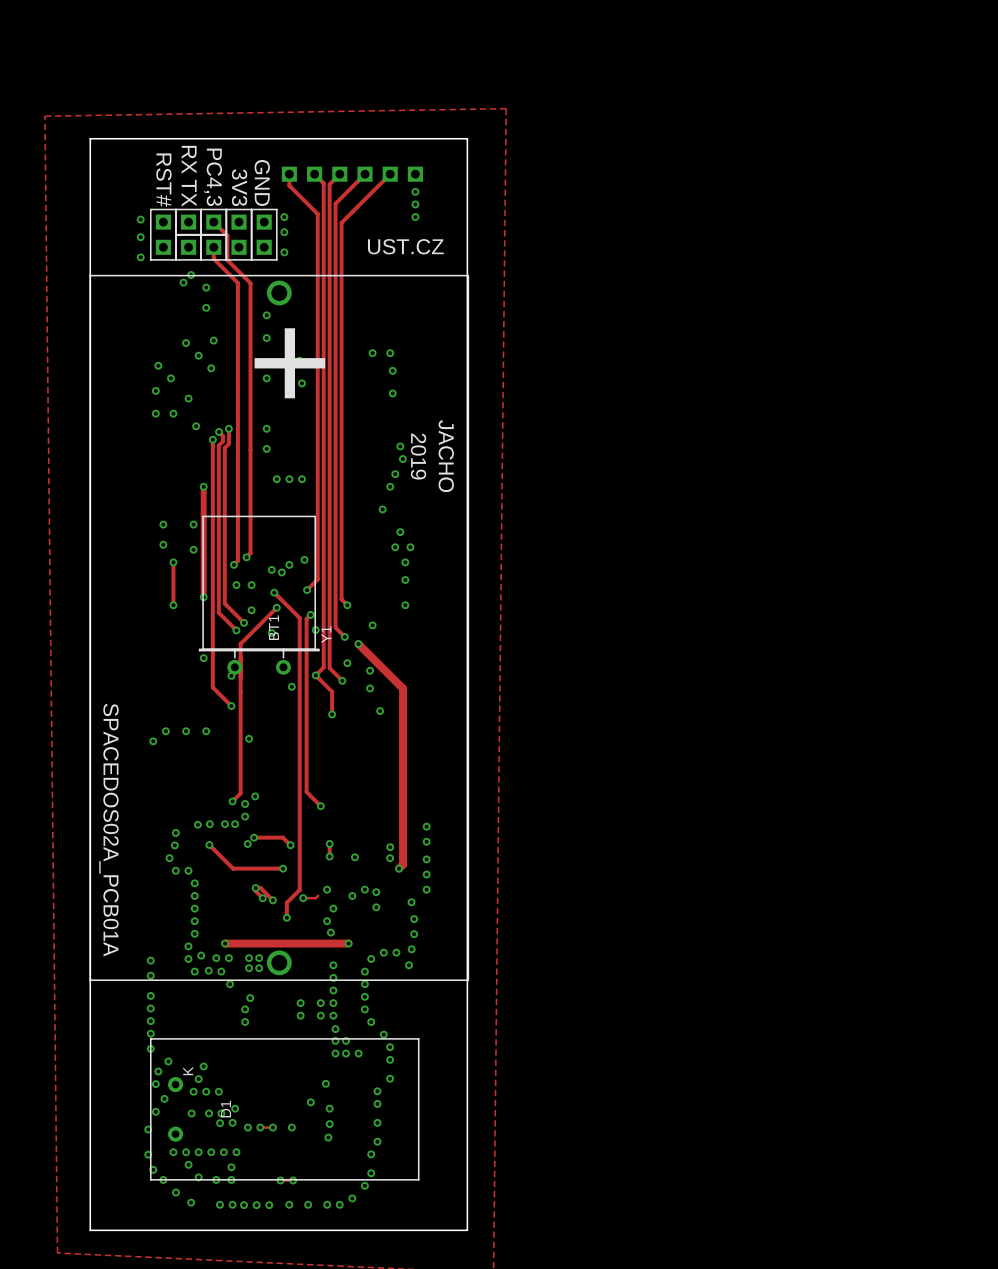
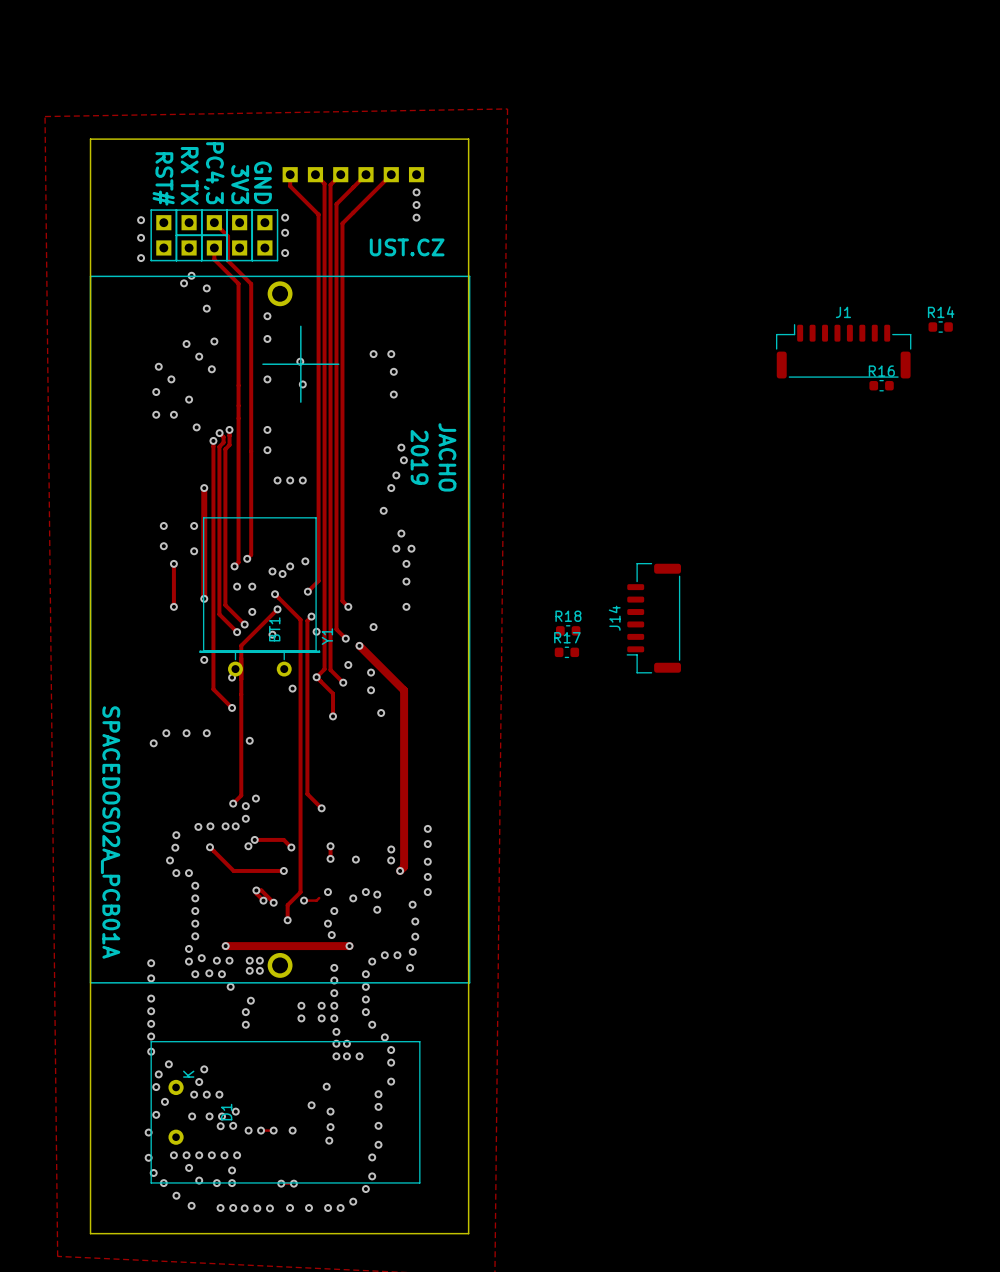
R14: none -> (940, 327)
J1: none -> (843, 351)
R16: none -> (881, 385)
J14: none -> (653, 618)
R18: none -> (568, 630)
R17: none -> (566, 652)

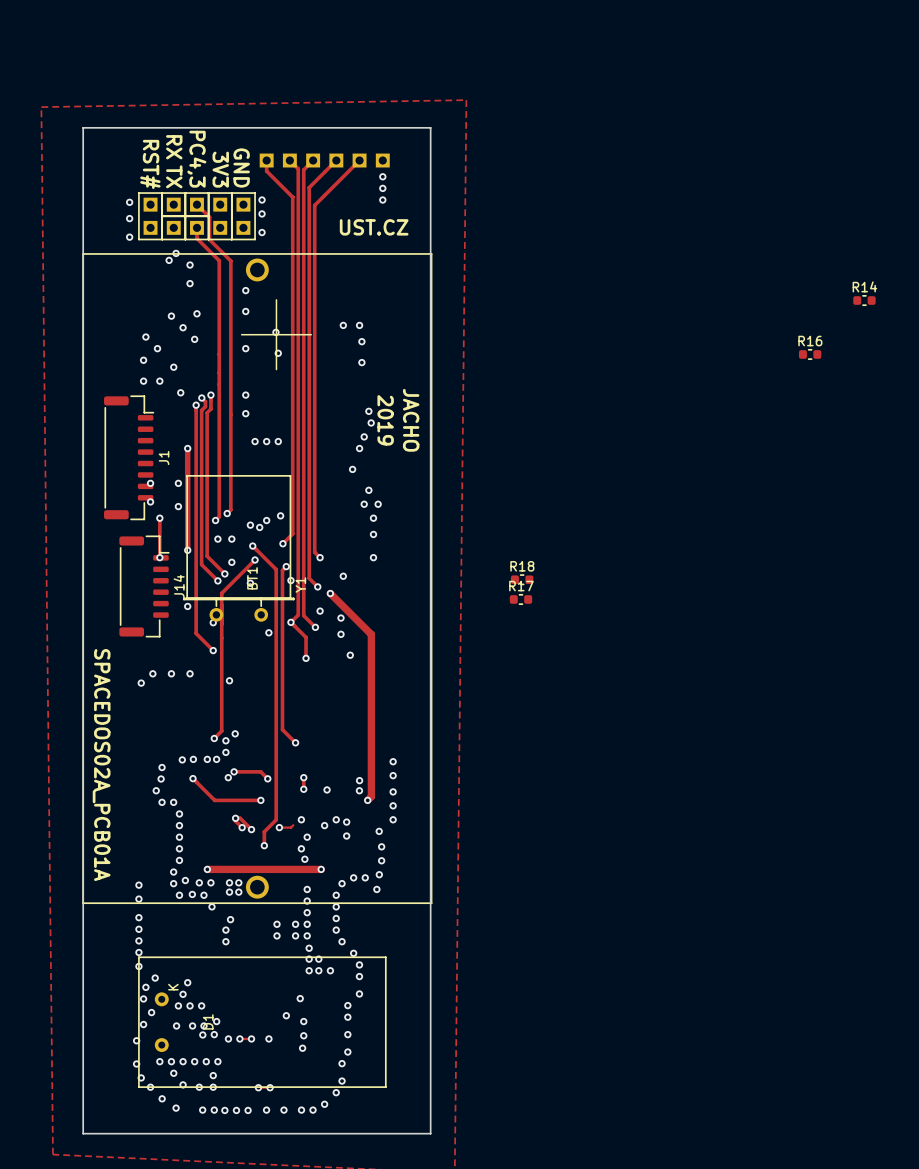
J1 rotation: 0° (843, 351) -> 90° clockwise (128, 457)
J1 position: (843, 351) -> (128, 457)
J14 rotation: 0° (653, 618) -> 180° (144, 586)
J14 position: (653, 618) -> (144, 586)

